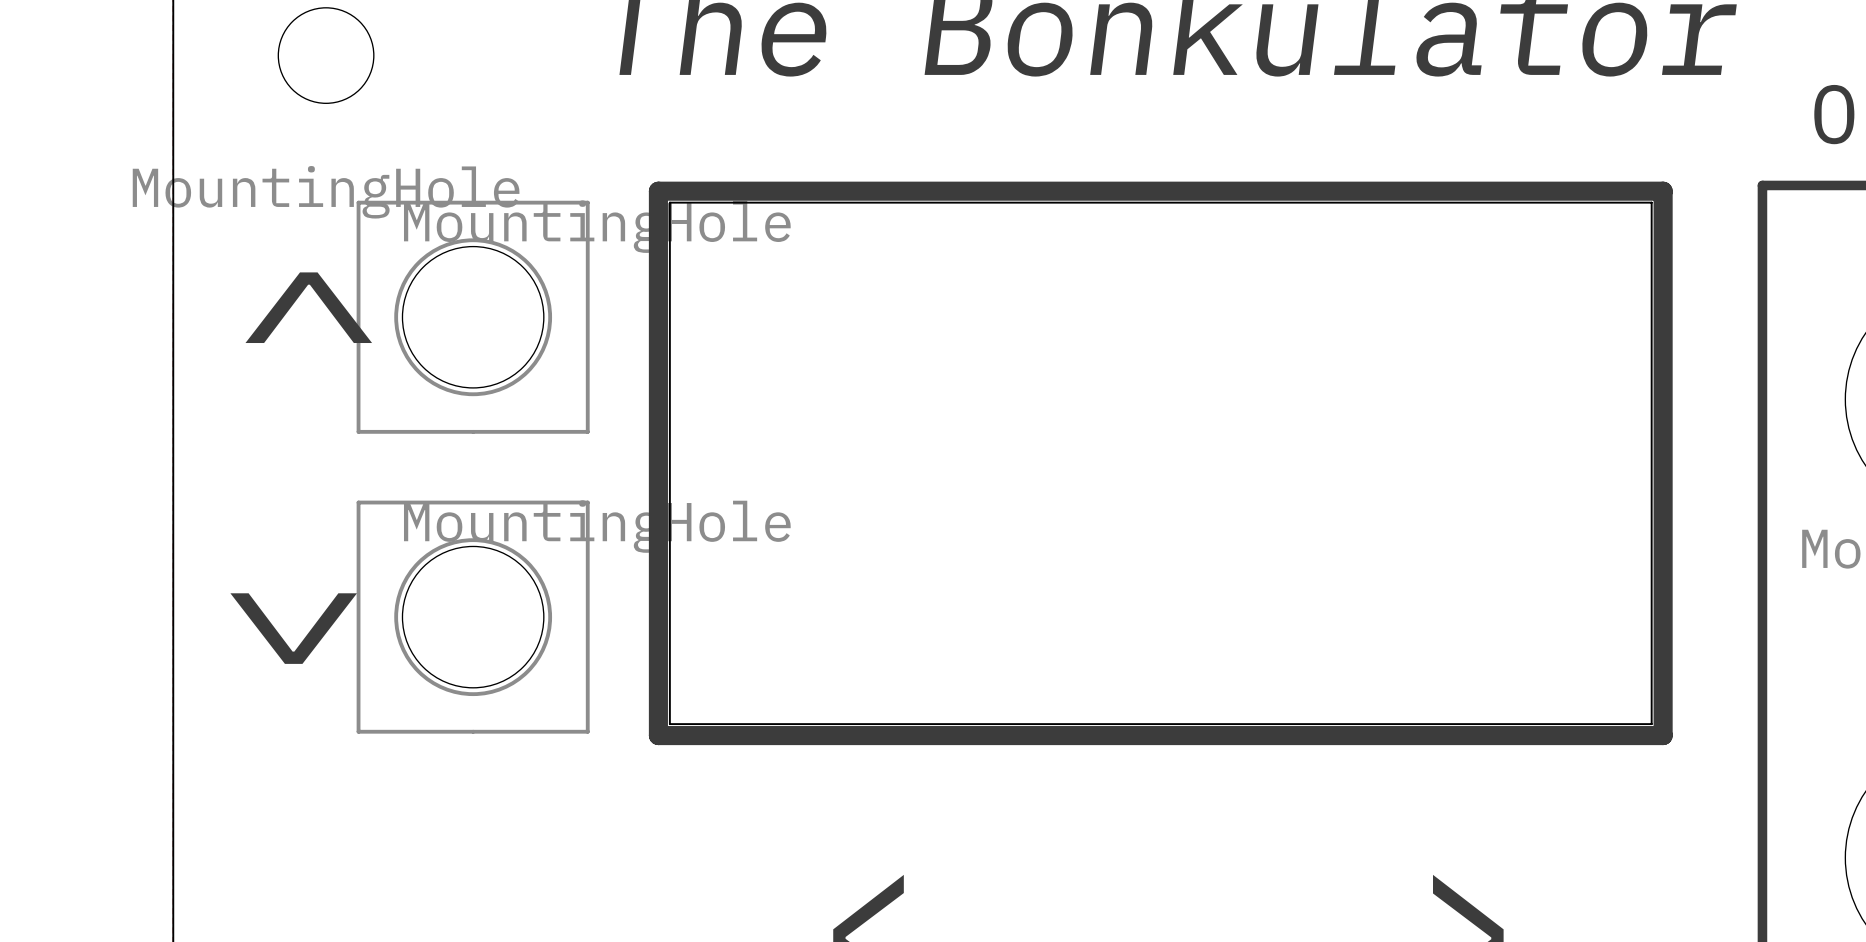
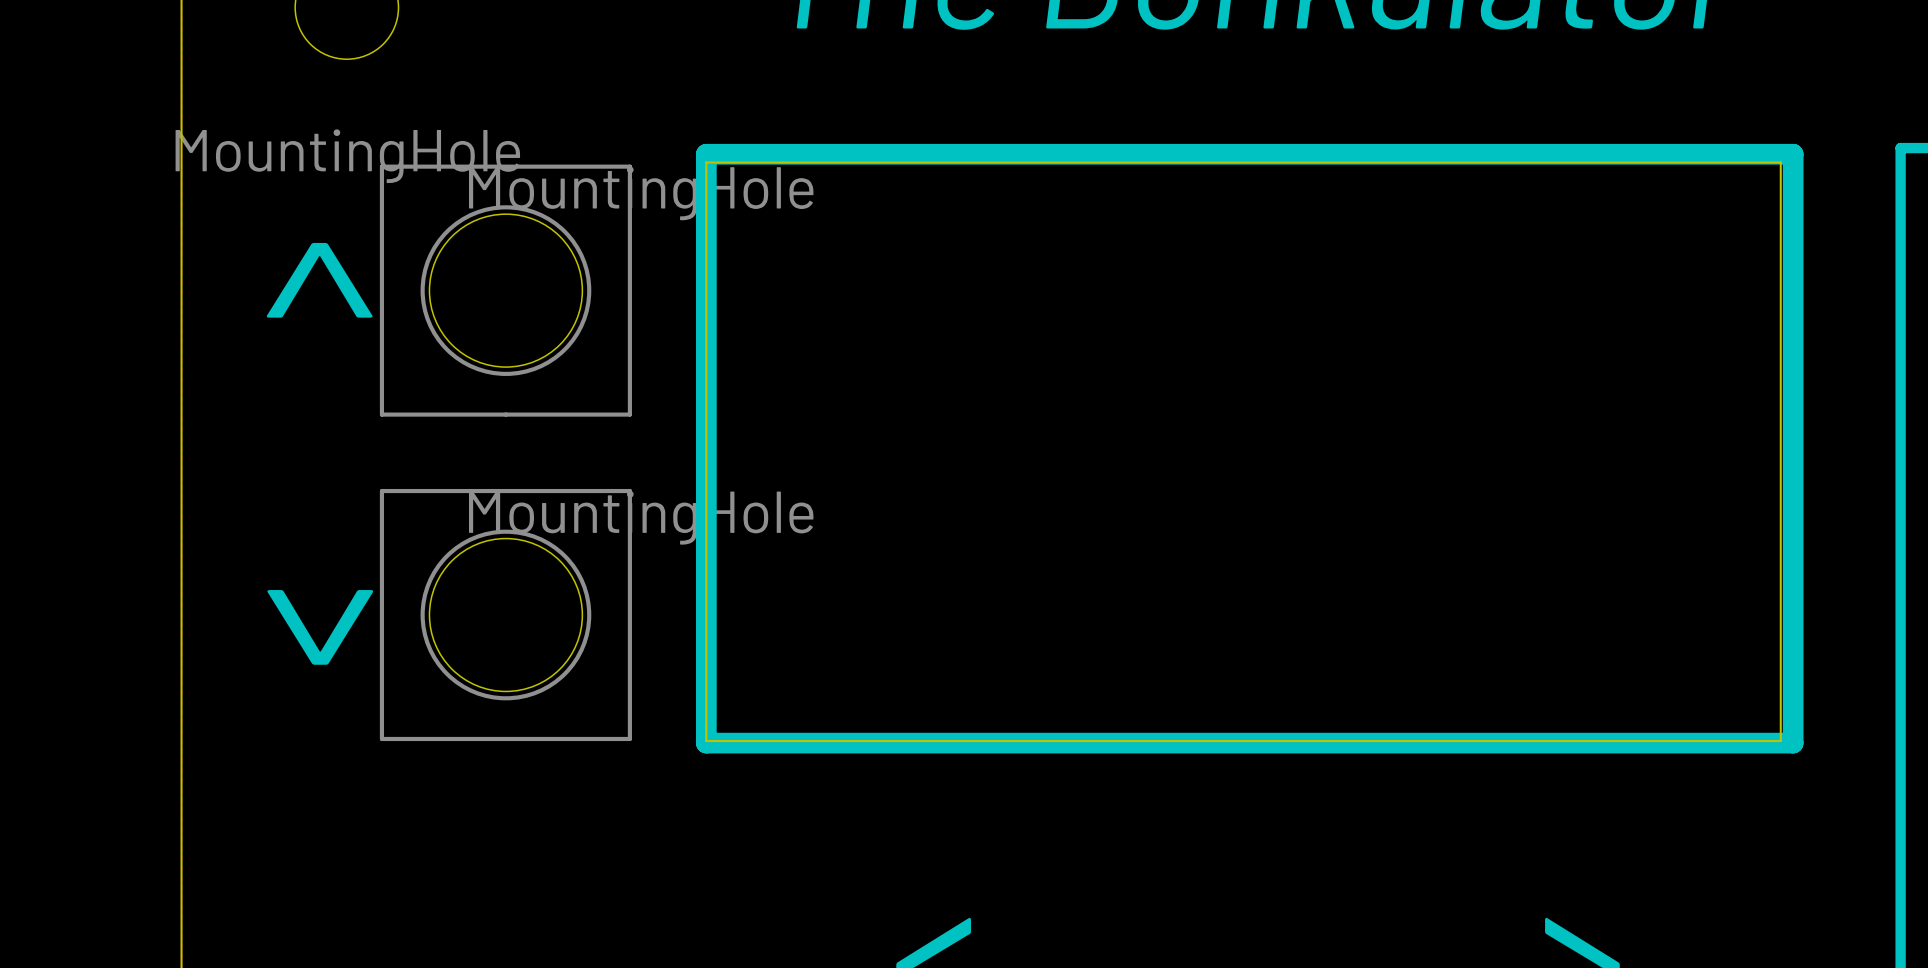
board edge: (1651, 202) (669, 202) (669, 724) (1651, 724) -> (1780, 166) (1780, 162) (706, 162) (706, 741) (1780, 741) (1780, 730)

